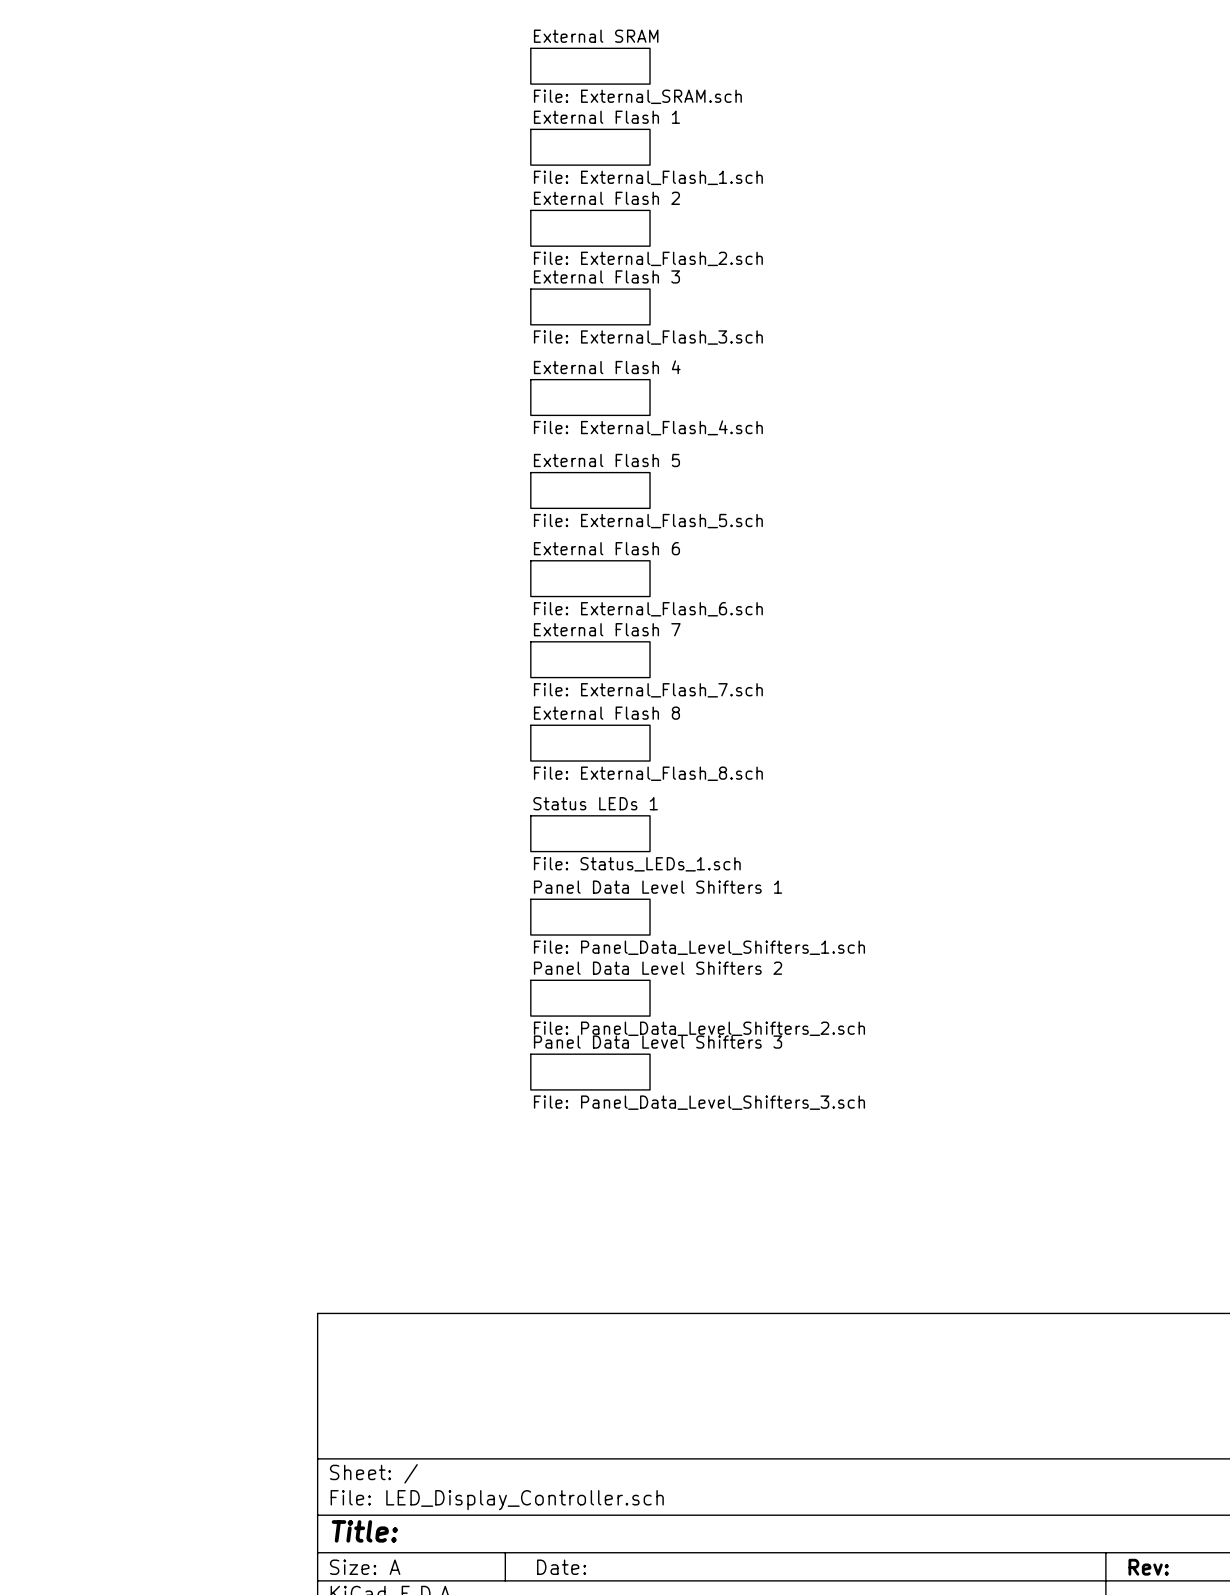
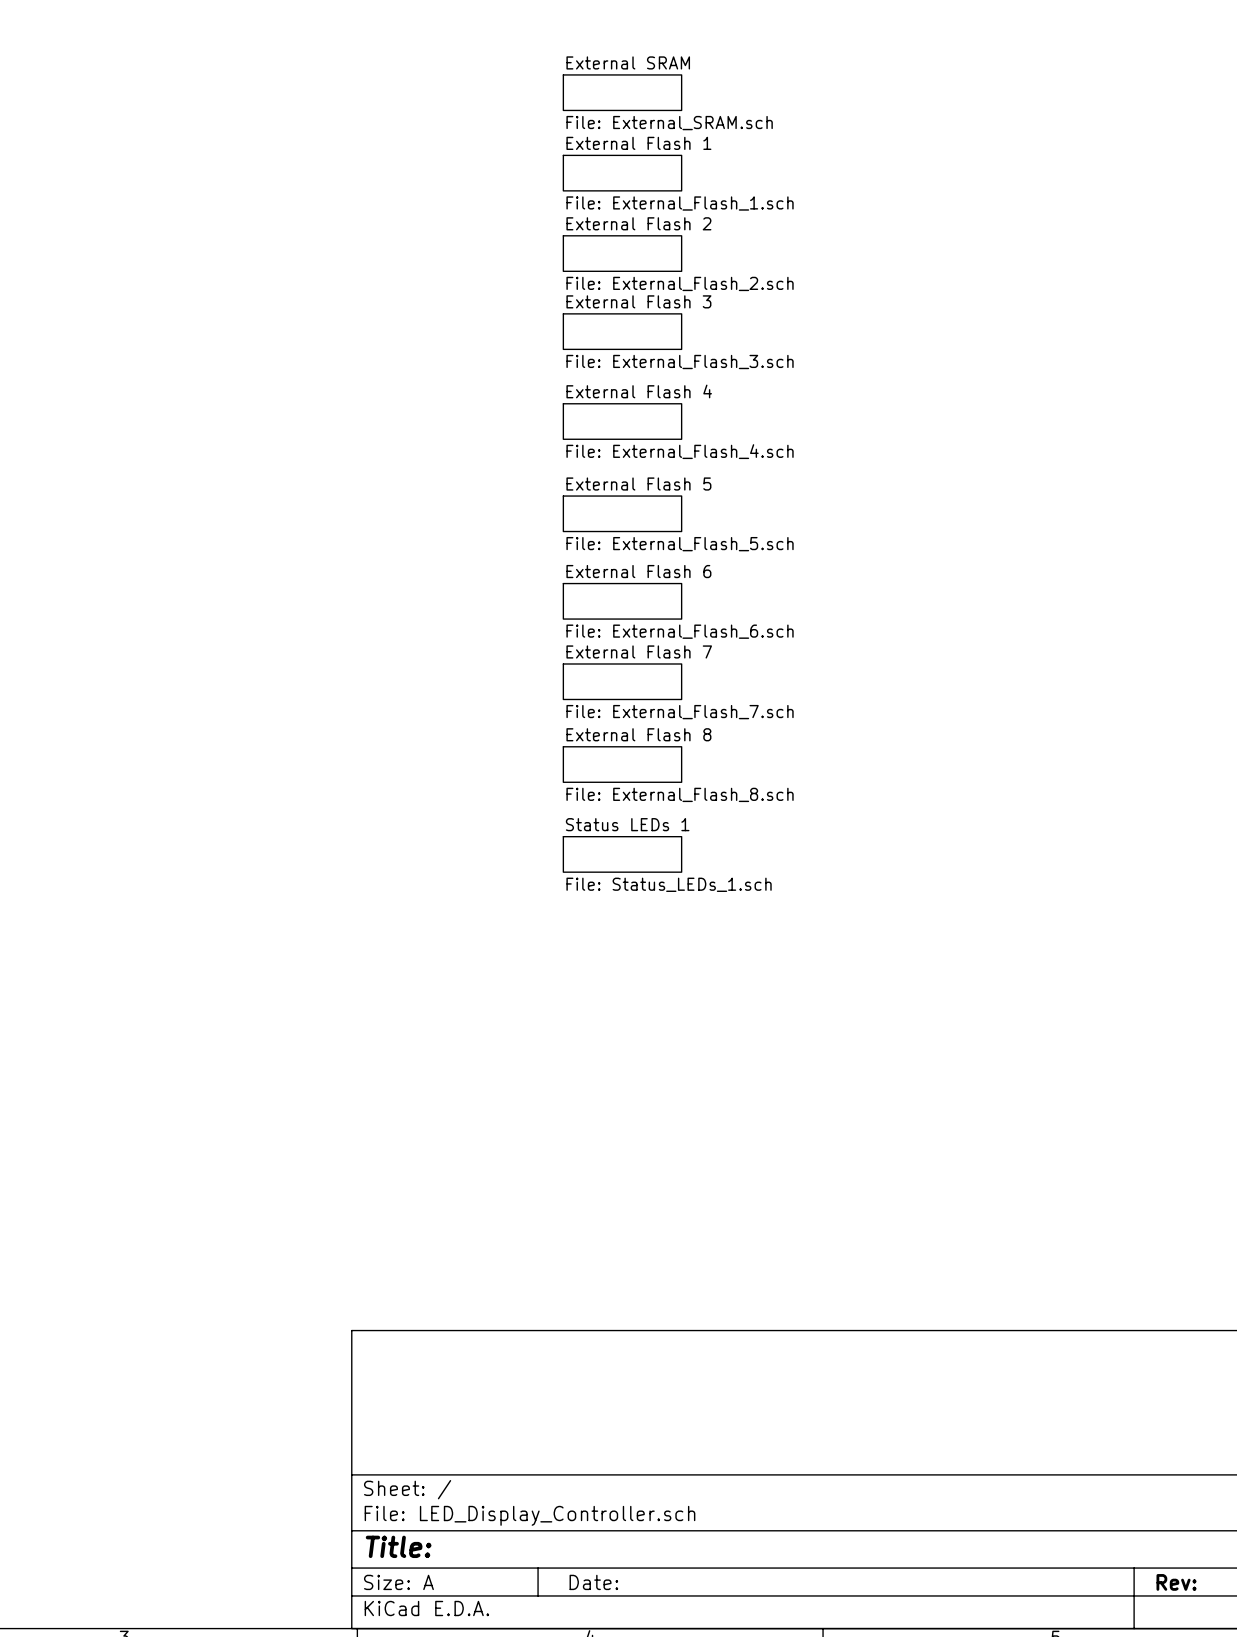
sheet Panel Data Level Shifters 1: File: Panel_Data_Level_Shifters_1.sch (590, 917) -> none
sheet Panel Data Level Shifters 2: File: Panel_Data_Level_Shifters_2.sch (590, 998) -> none
sheet Panel Data Level Shifters 3: File: Panel_Data_Level_Shifters_3.sch (590, 1072) -> none

